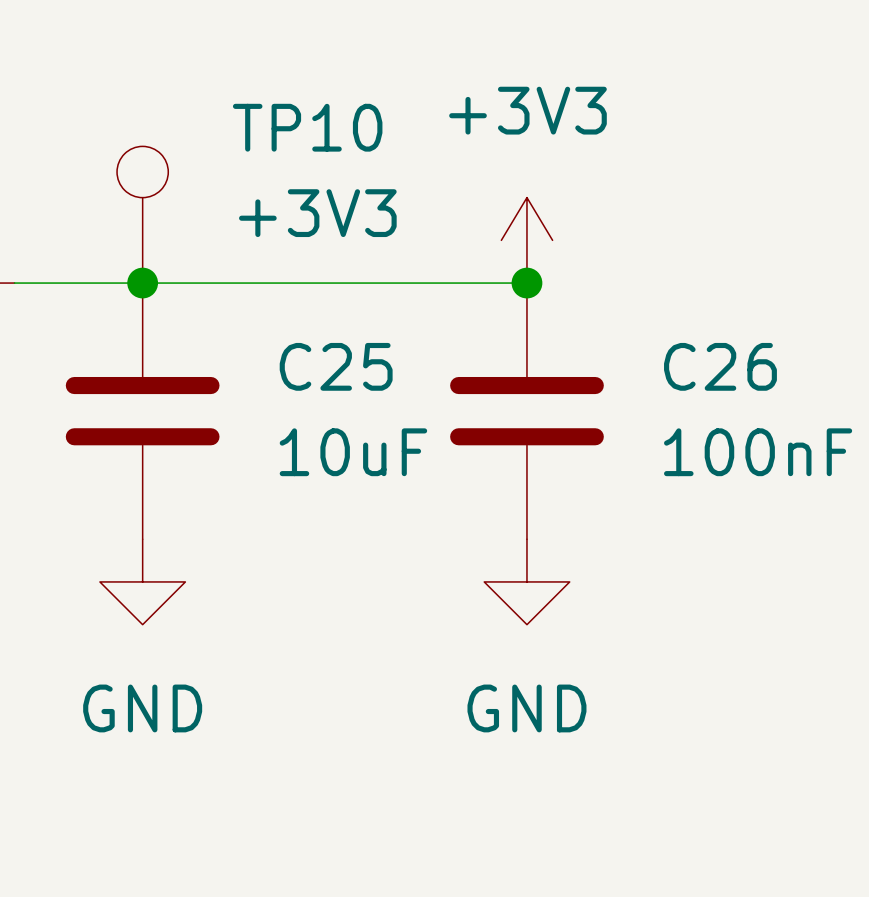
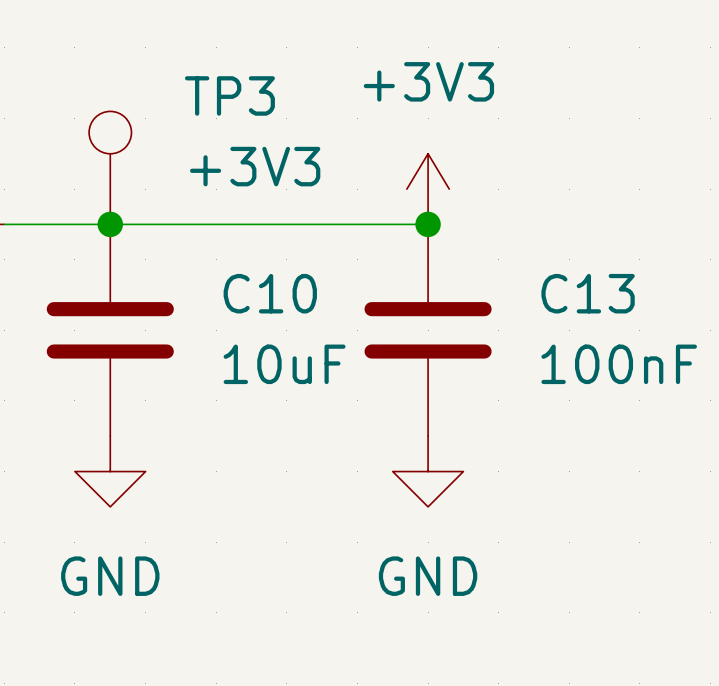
TP10 name: TP10 (307, 127) -> TP3 (229, 95)
C25 name: C25 (336, 366) -> C10 (270, 293)
C26 name: C26 (720, 366) -> C13 (588, 293)

